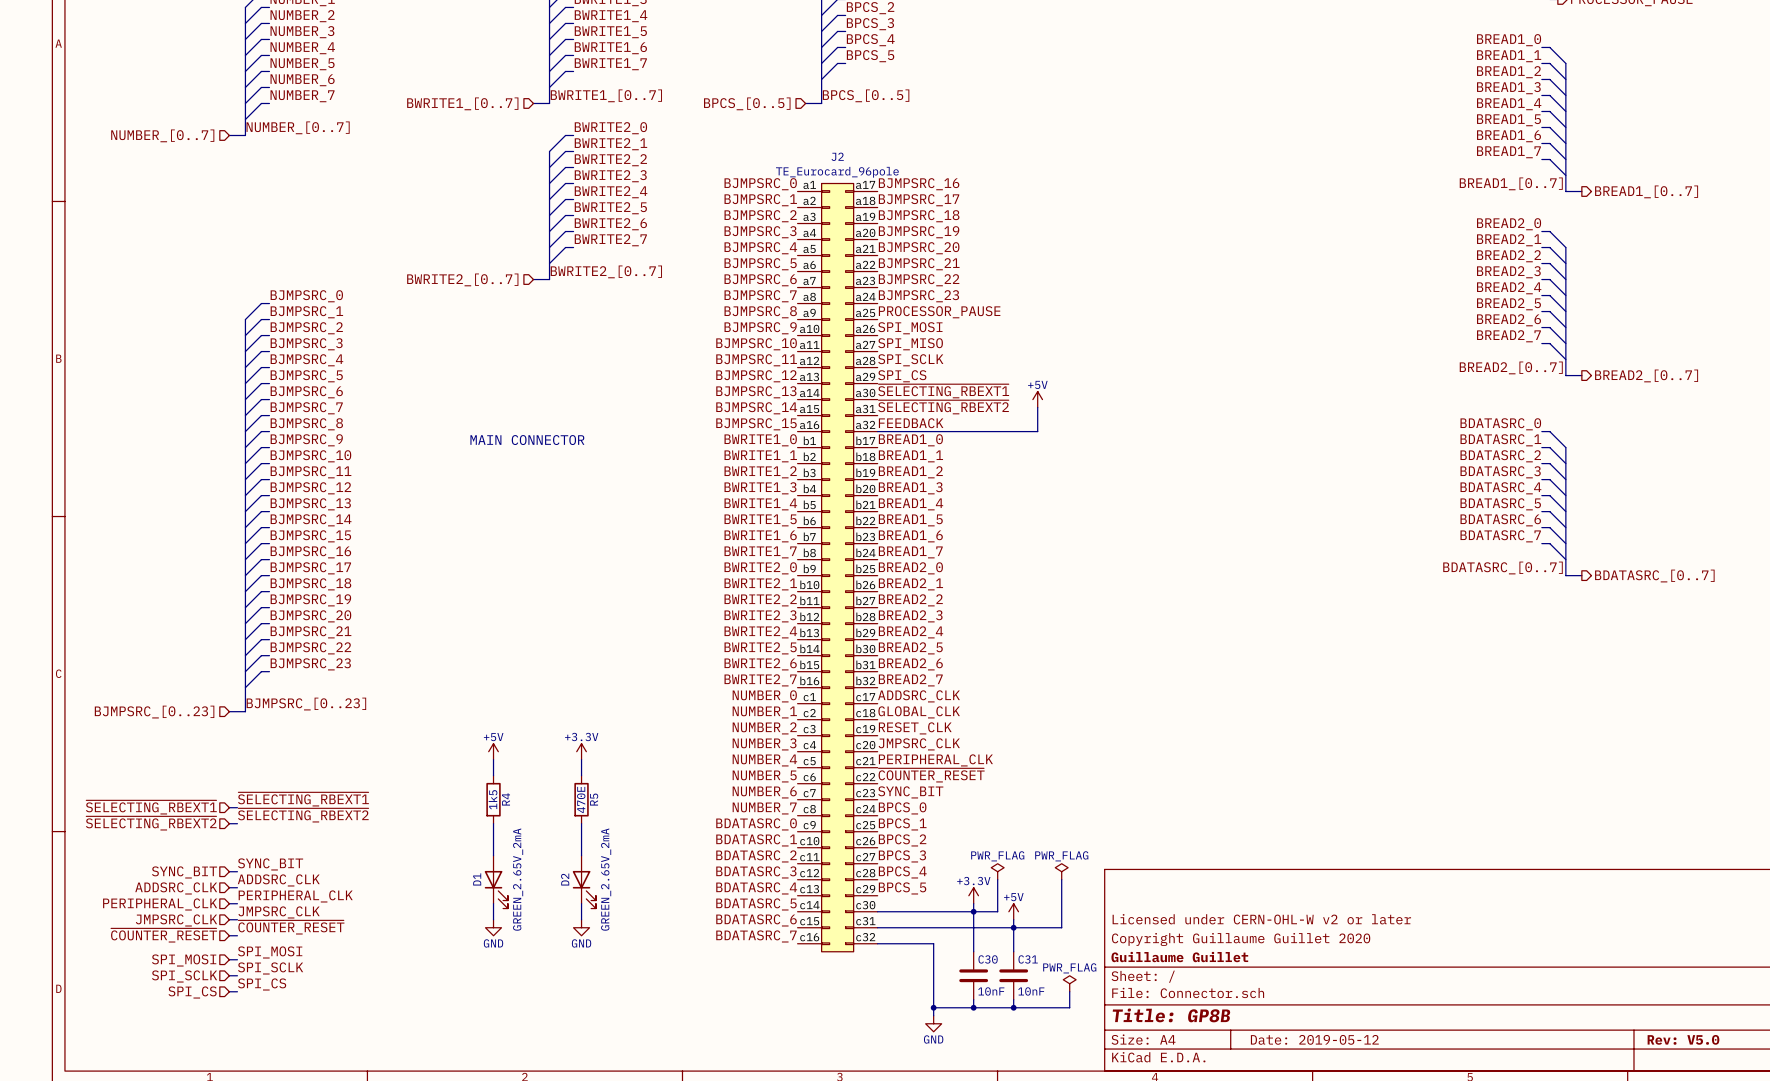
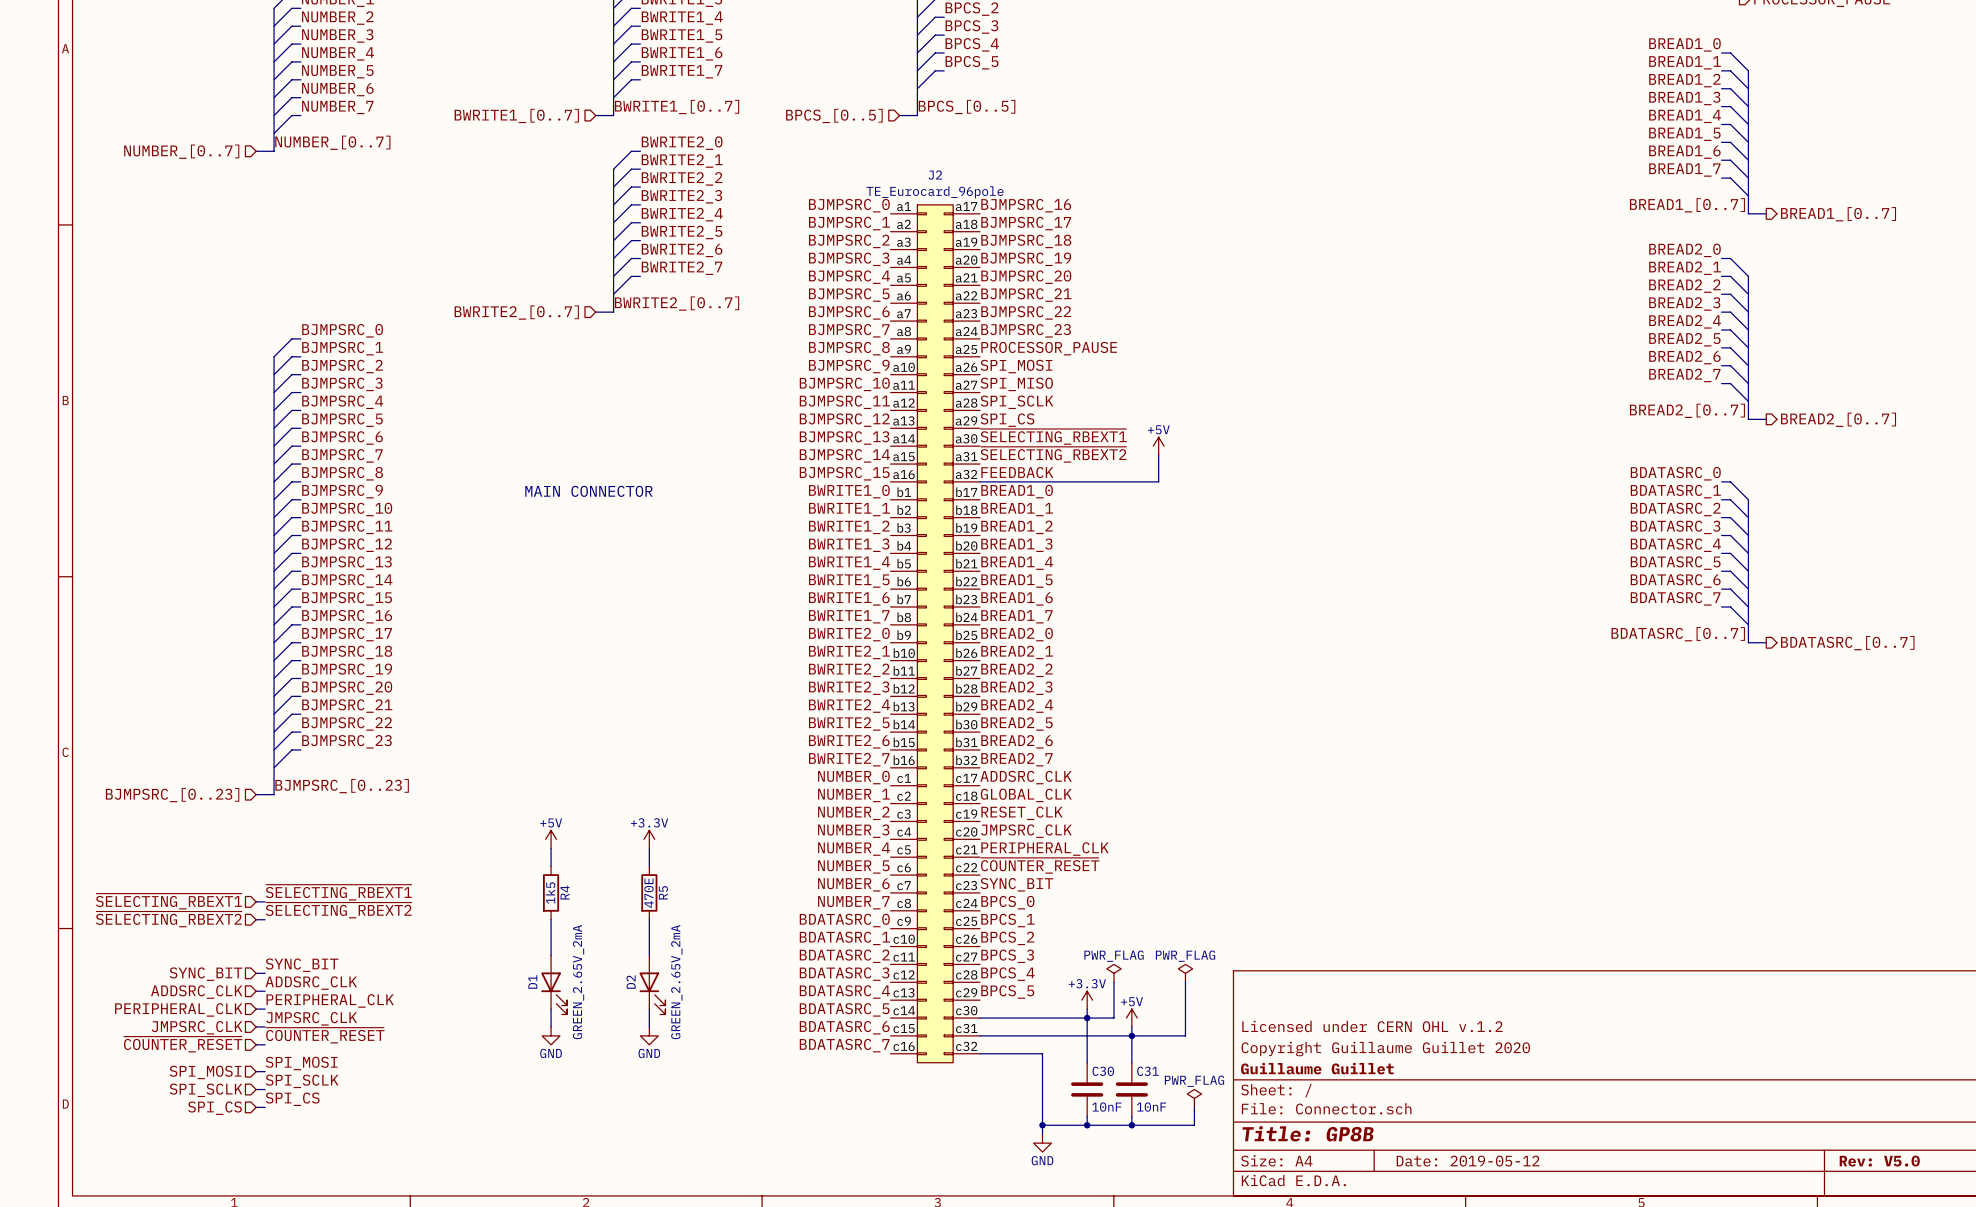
title block: Licensed under CERN-OHL-W v2 or later (1261, 919) -> Licensed under CERN OHL v.1.2 (1372, 1026)

